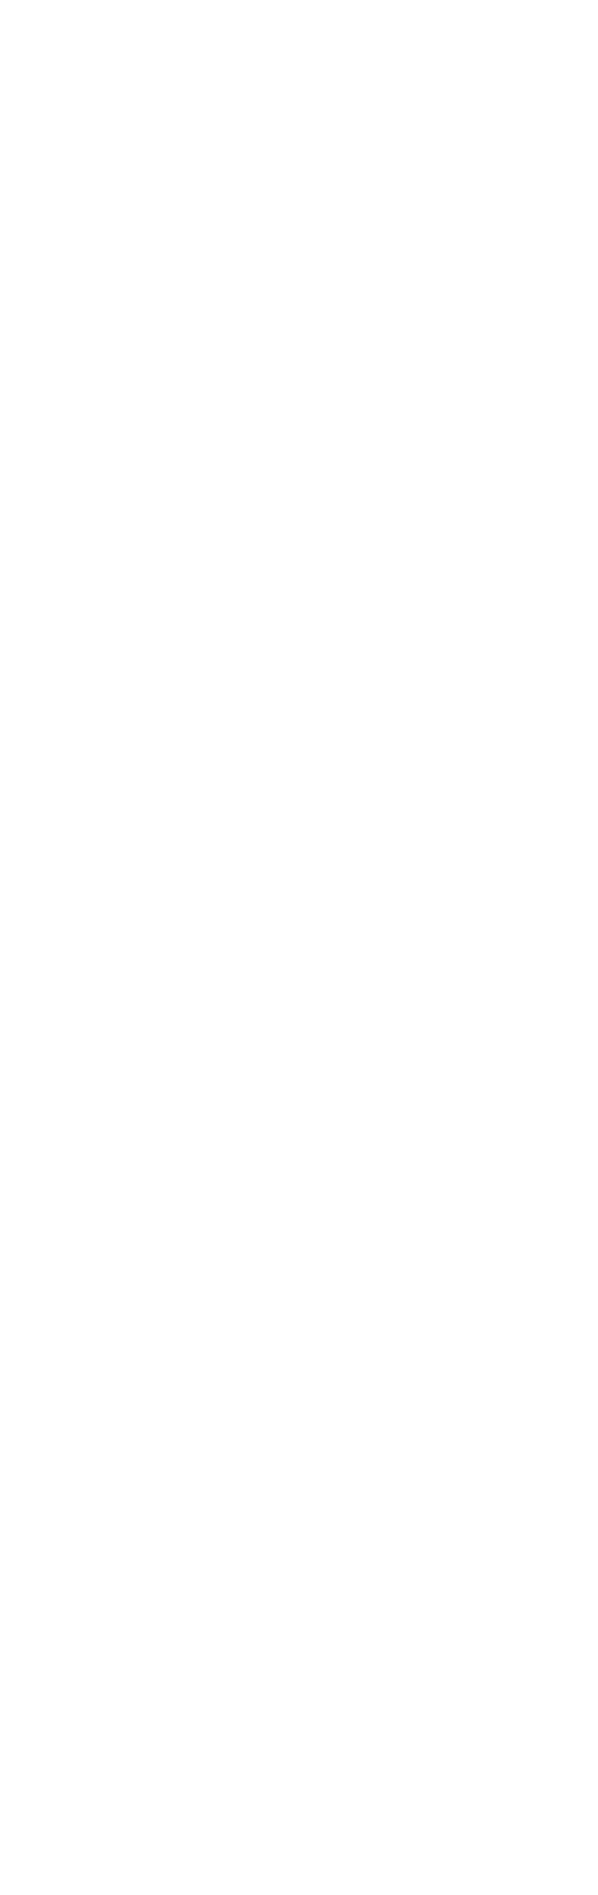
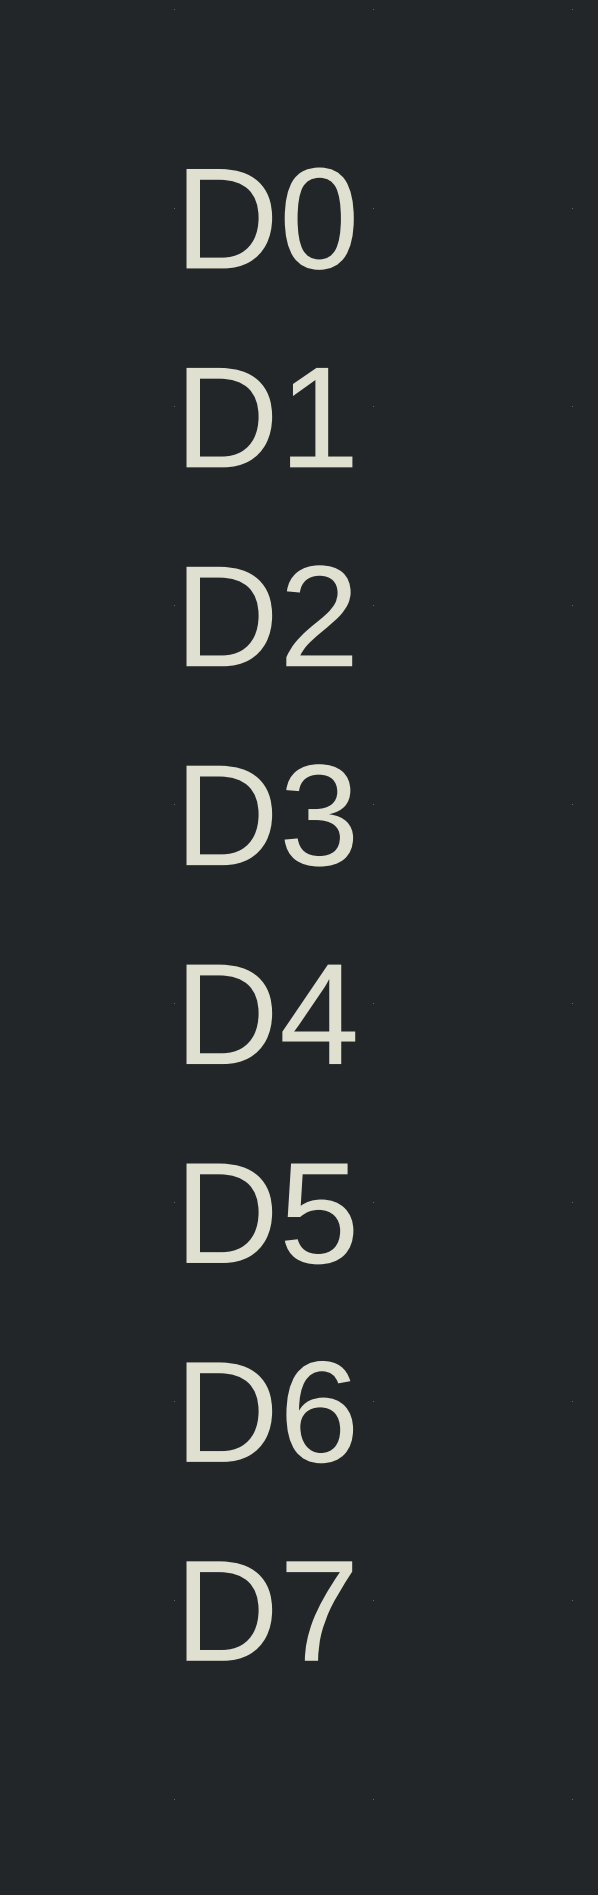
label: none -> D0 (270, 218)
label: none -> D1 (269, 417)
label: none -> D2 (269, 615)
label: none -> D3 (269, 815)
label: none -> D4 (270, 1014)
label: none -> D5 (269, 1213)
label: none -> D6 (269, 1412)
label: none -> D7 (269, 1611)

